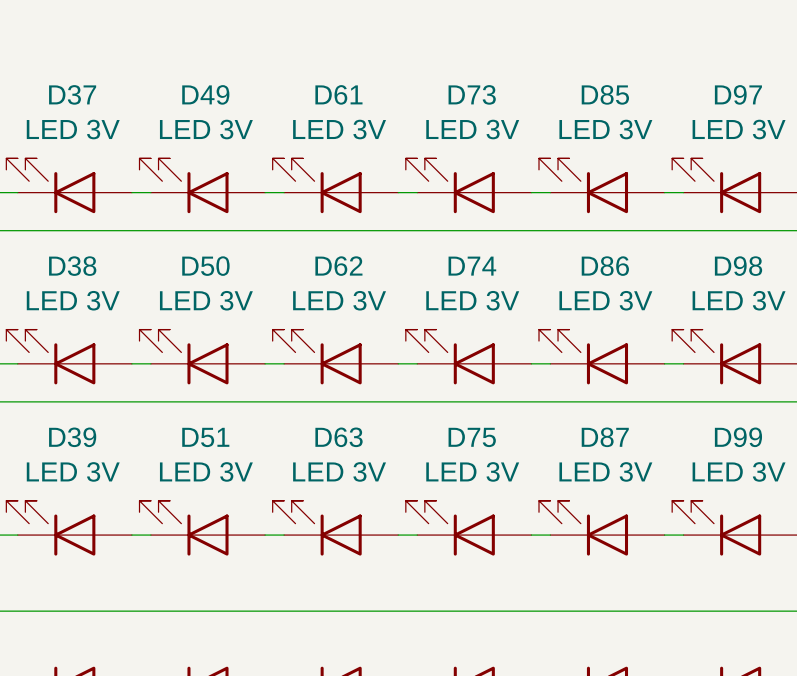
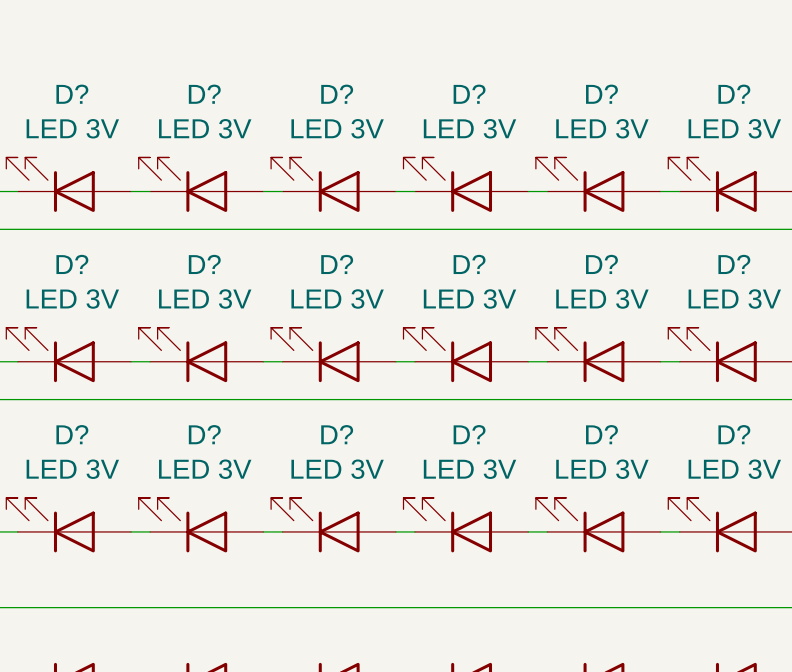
D37 name: D37 (72, 94) -> D? (72, 94)
D49 name: D49 (205, 94) -> D? (204, 94)
D61 name: D61 (338, 94) -> D? (337, 94)
D73 name: D73 (472, 94) -> D? (469, 94)
D85 name: D85 (605, 94) -> D? (601, 94)
D97 name: D97 (738, 94) -> D? (734, 94)
D38 name: D38 (72, 266) -> D? (72, 264)
D50 name: D50 (205, 266) -> D? (204, 264)
D62 name: D62 (338, 266) -> D? (337, 264)
D74 name: D74 (472, 266) -> D? (469, 264)
D86 name: D86 (605, 266) -> D? (601, 264)
D98 name: D98 (738, 266) -> D? (734, 264)
D39 name: D39 (72, 437) -> D? (72, 434)
D51 name: D51 (205, 437) -> D? (204, 434)
D63 name: D63 (339, 437) -> D? (337, 434)
D75 name: D75 (472, 437) -> D? (469, 434)
D87 name: D87 (605, 437) -> D? (601, 434)
D99 name: D99 (738, 437) -> D? (734, 434)

